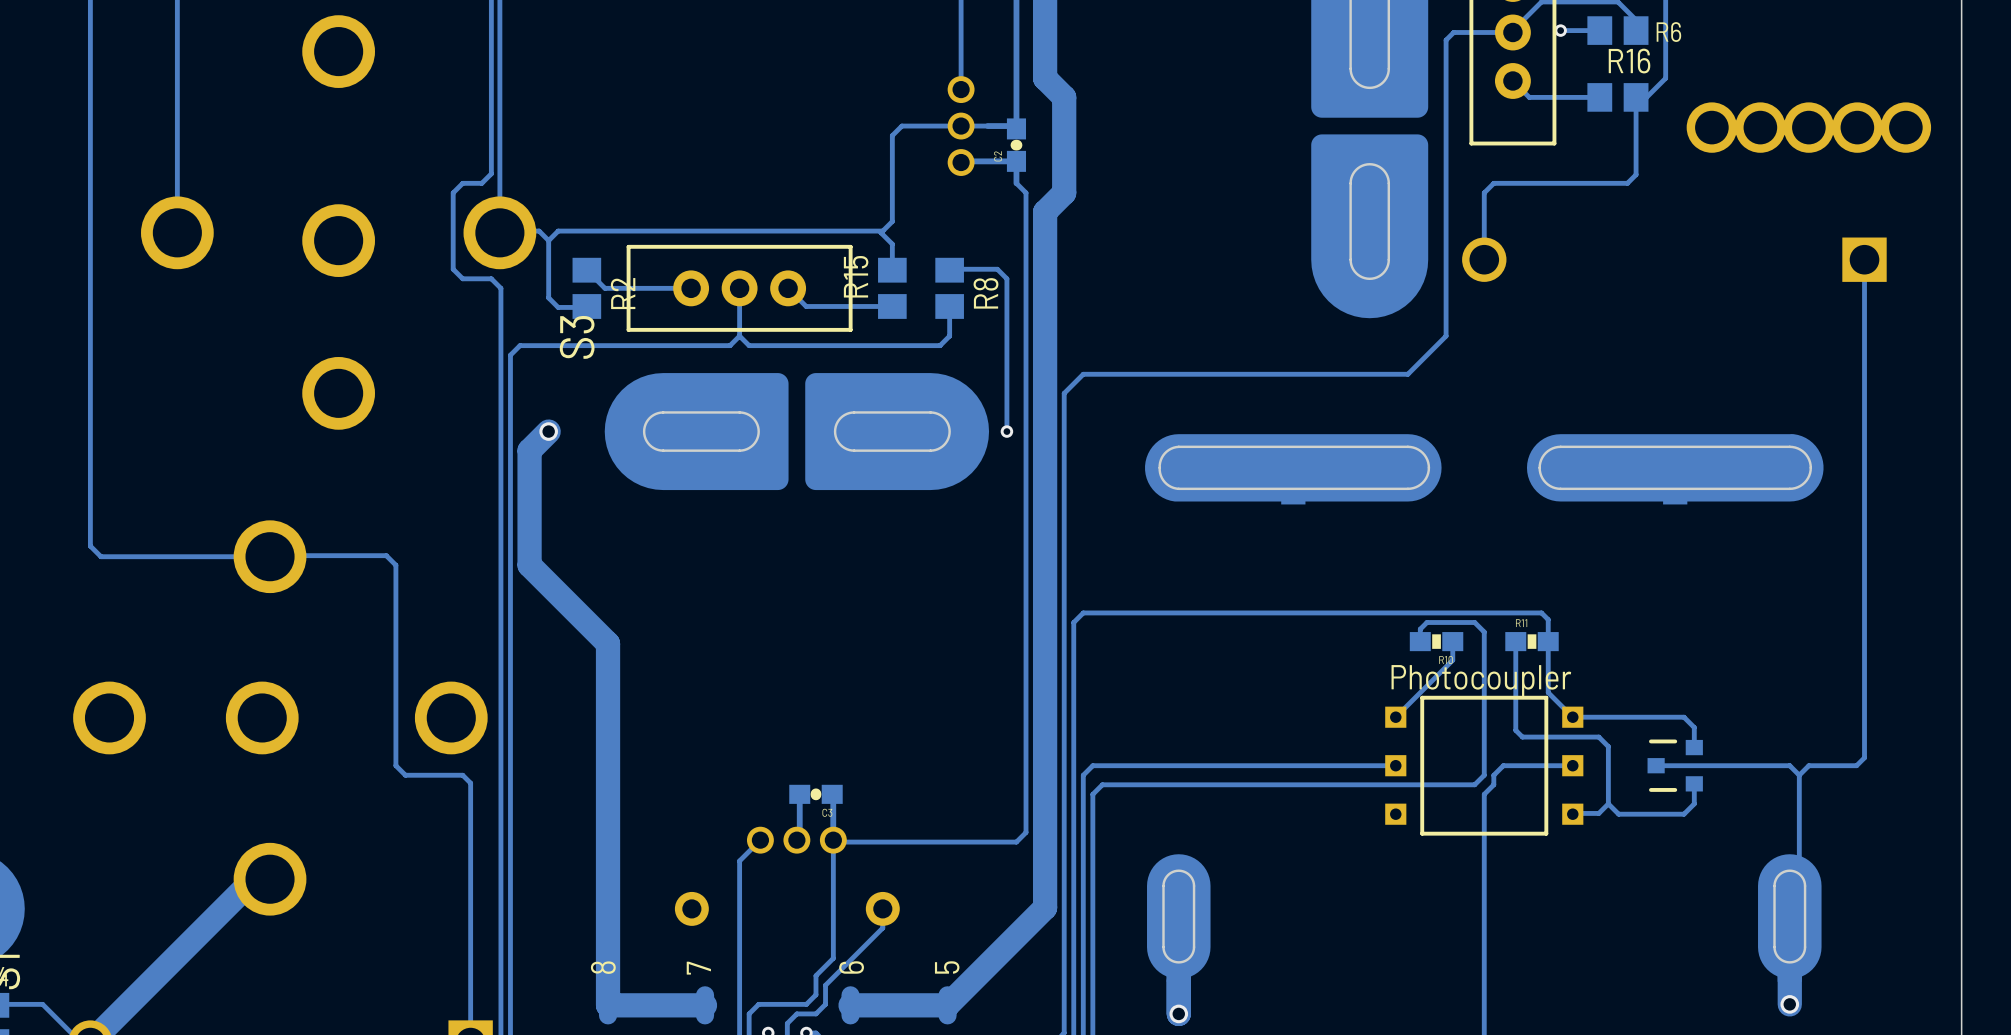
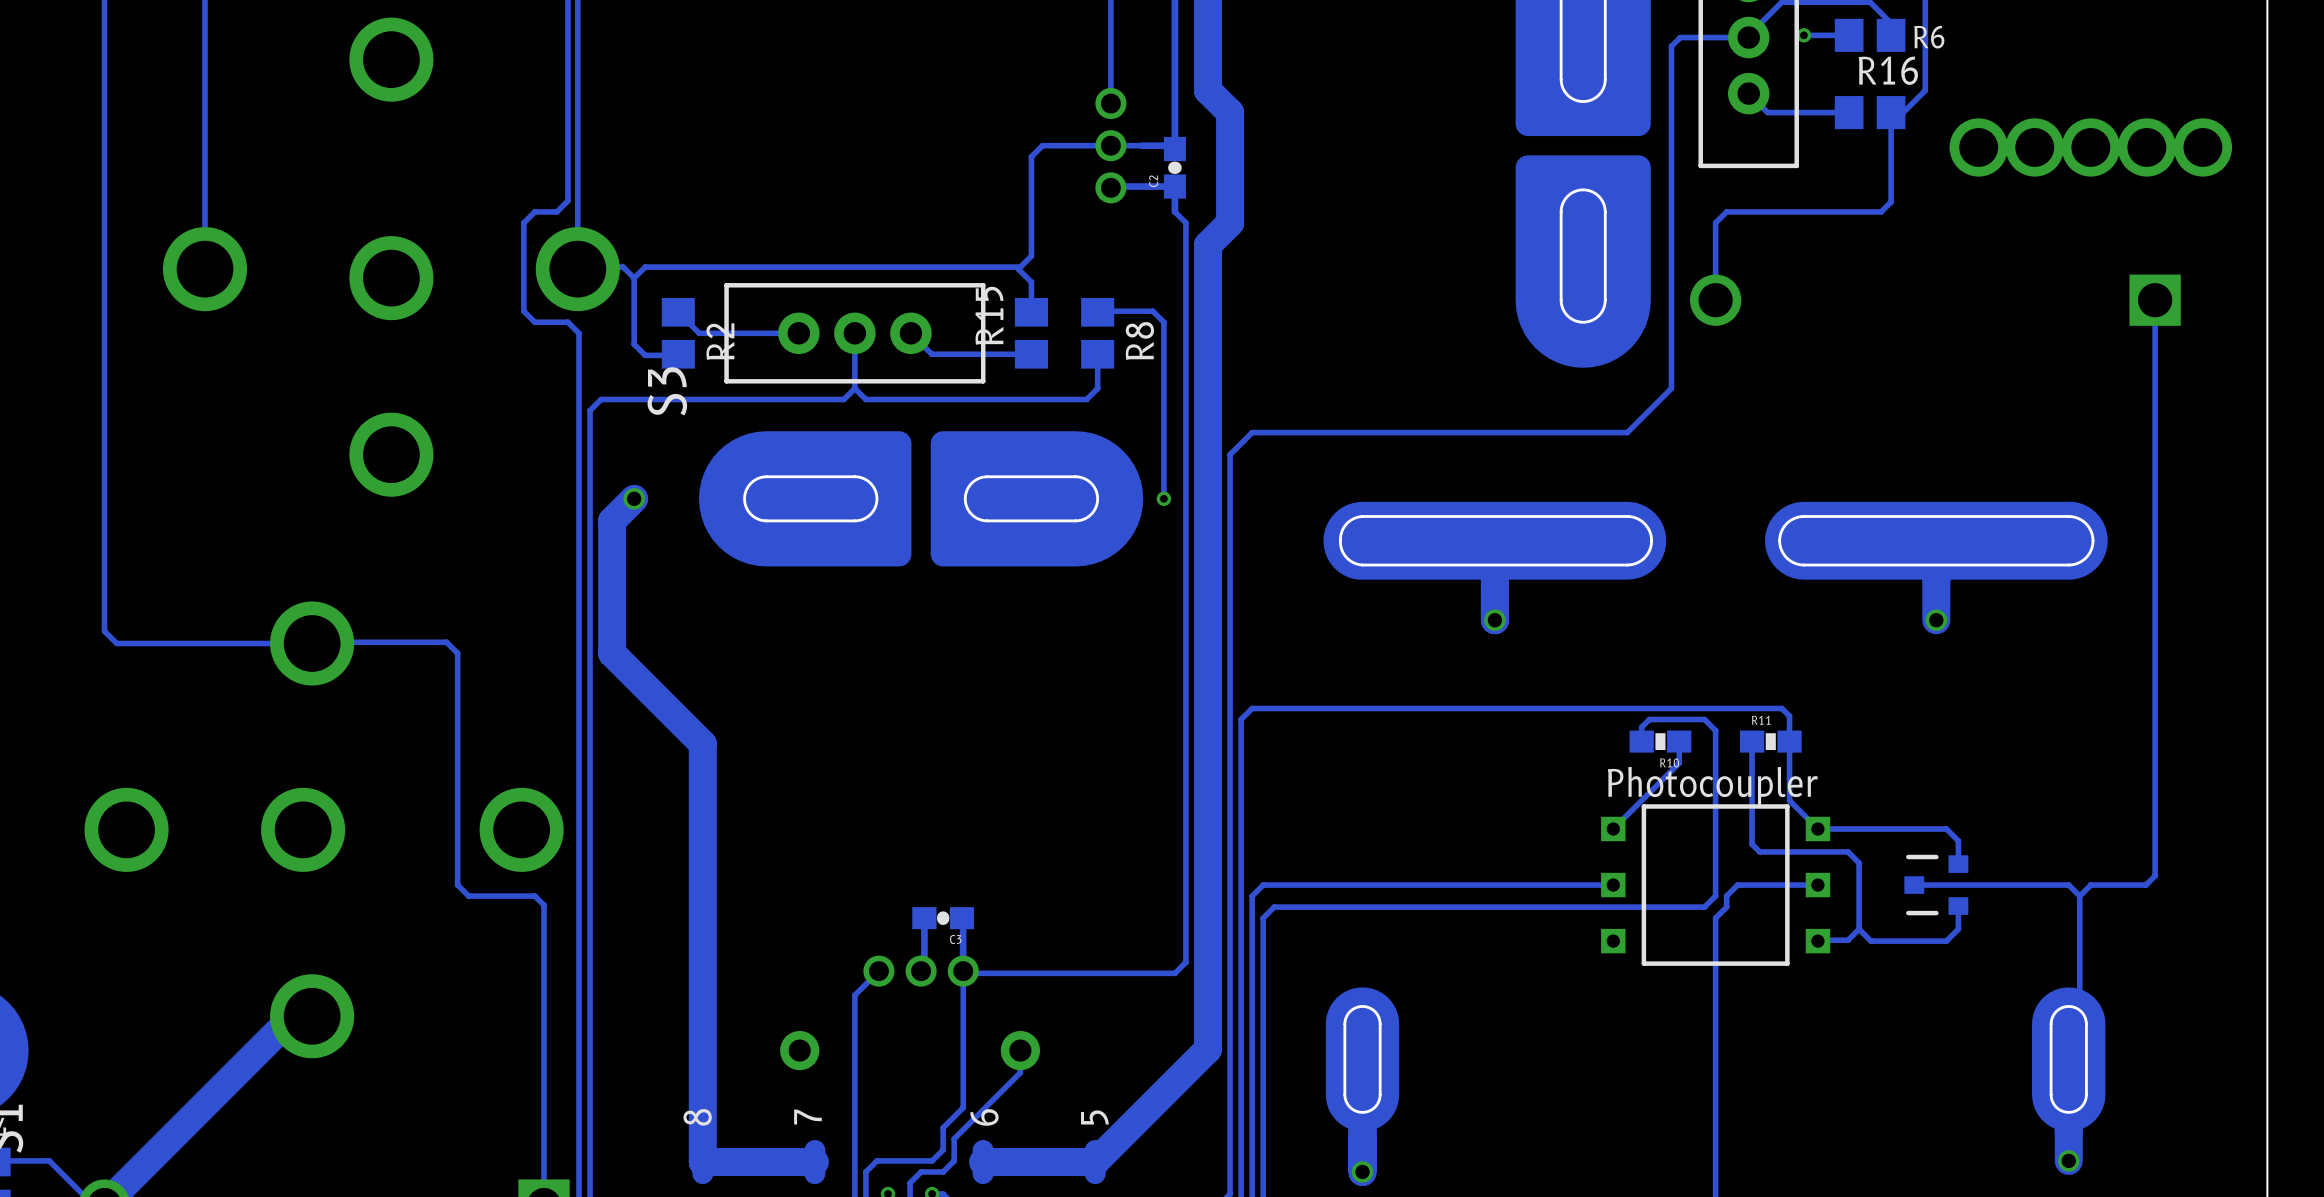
track: none -> (1936, 576) (1936, 620)
via: none -> (1494, 620)
via: none -> (1936, 620)

